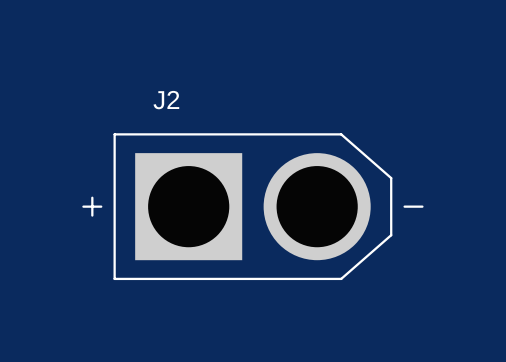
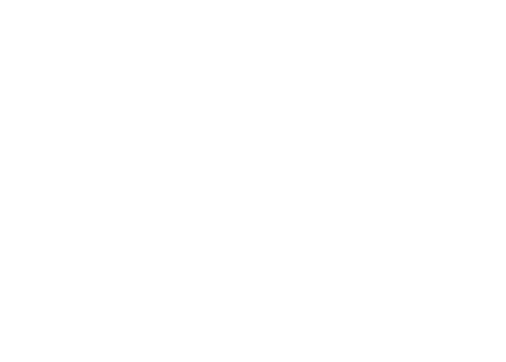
J2: (252, 206) -> none

